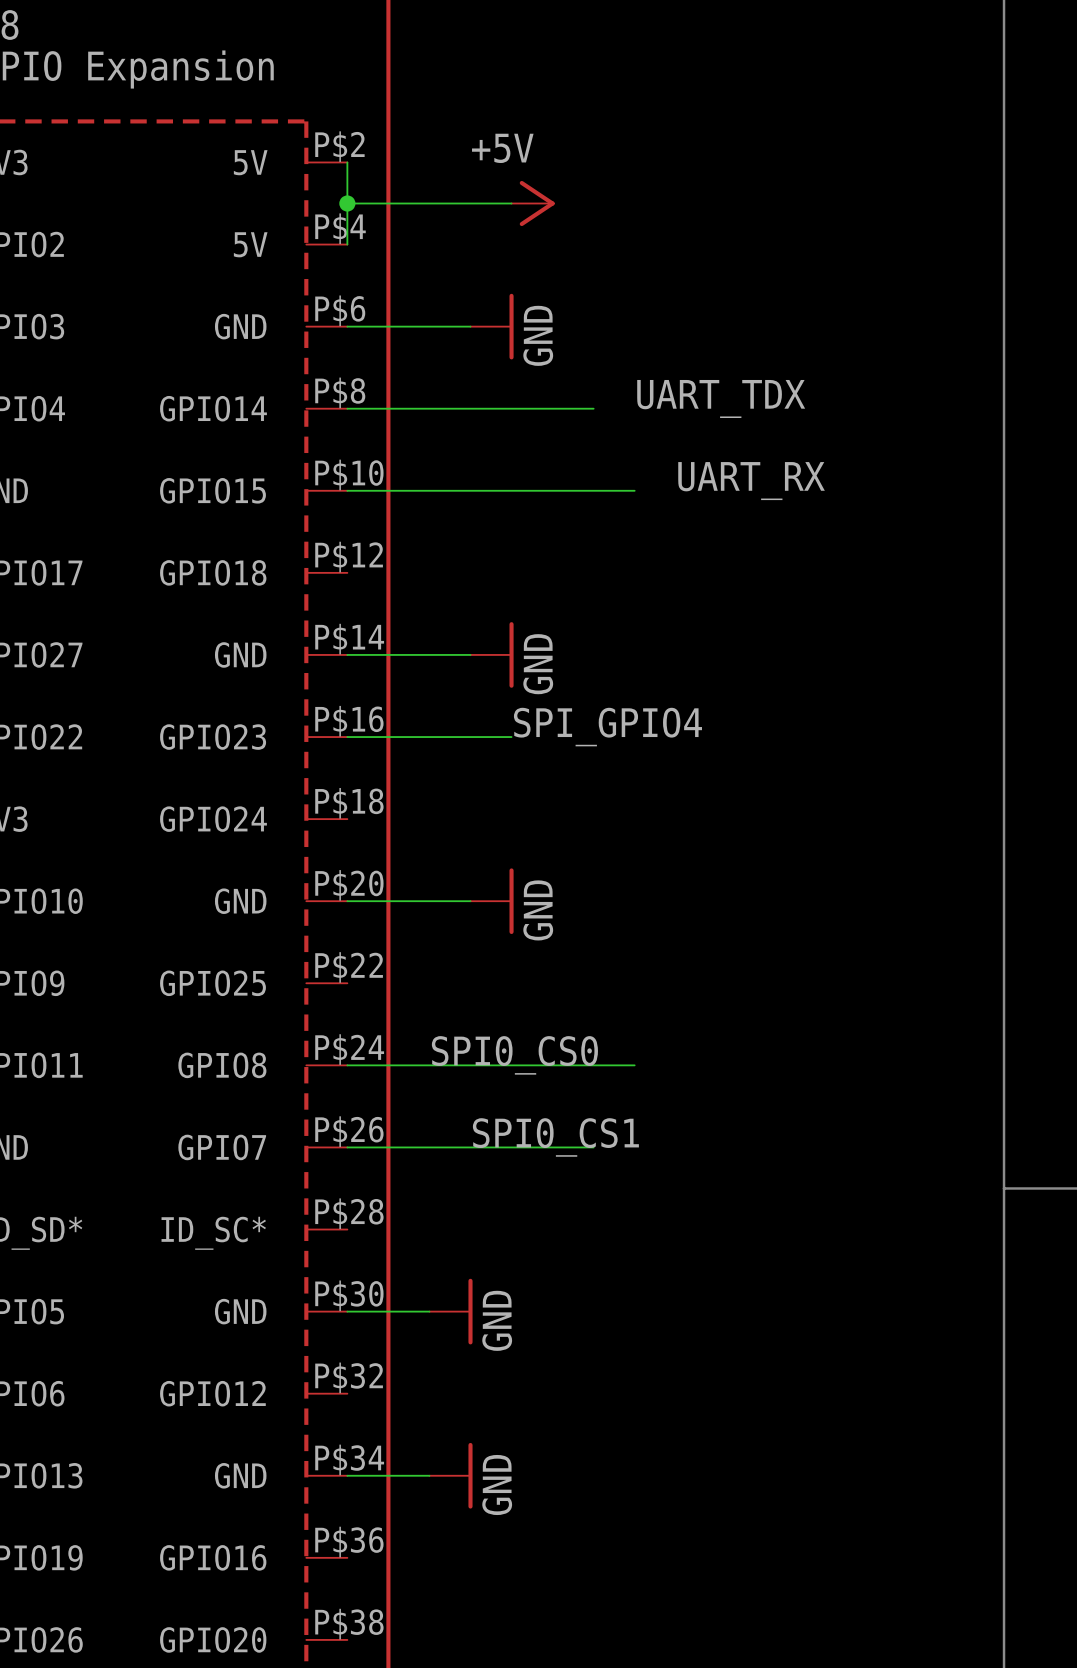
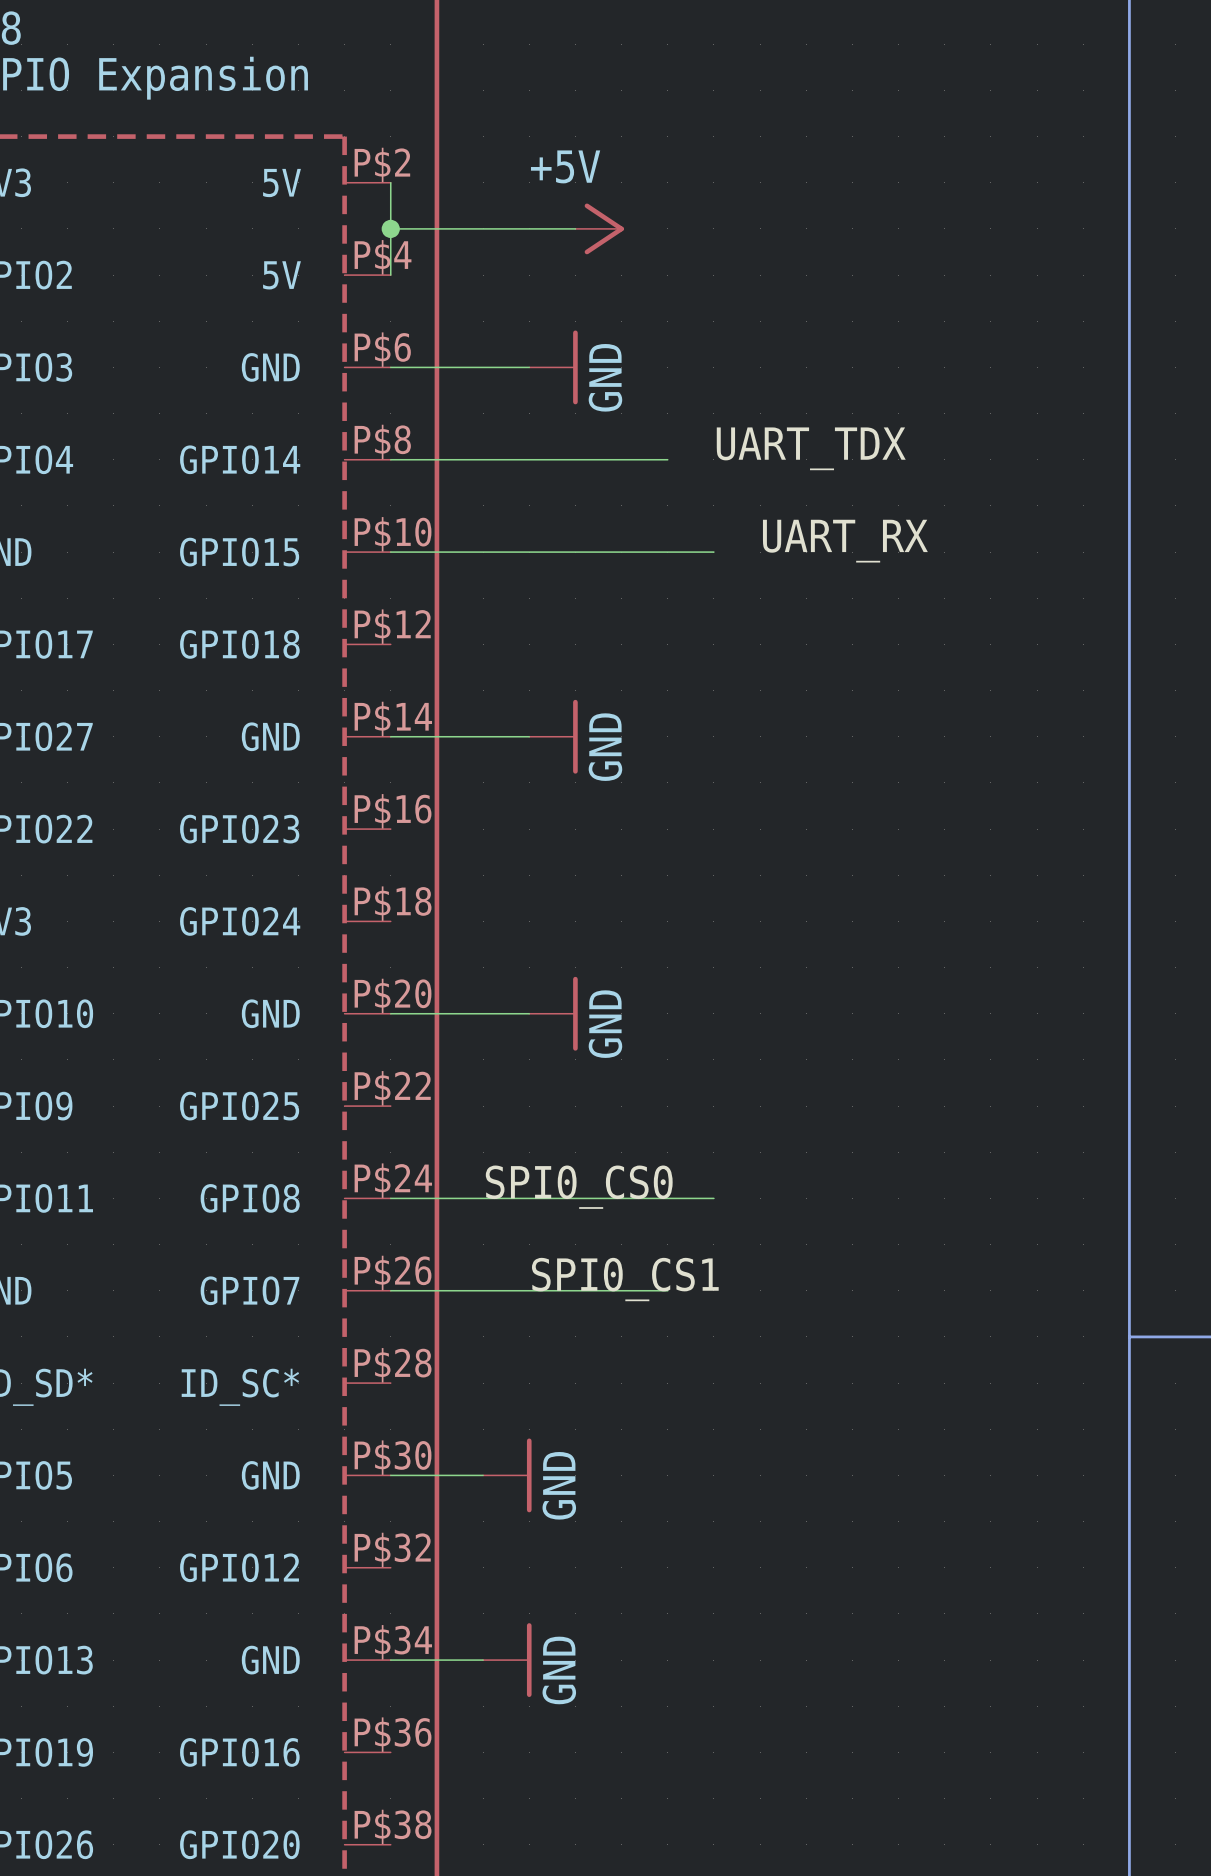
label: SPI_GPIO4 (607, 727) -> none
wire: (347, 737) (511, 737) -> none

